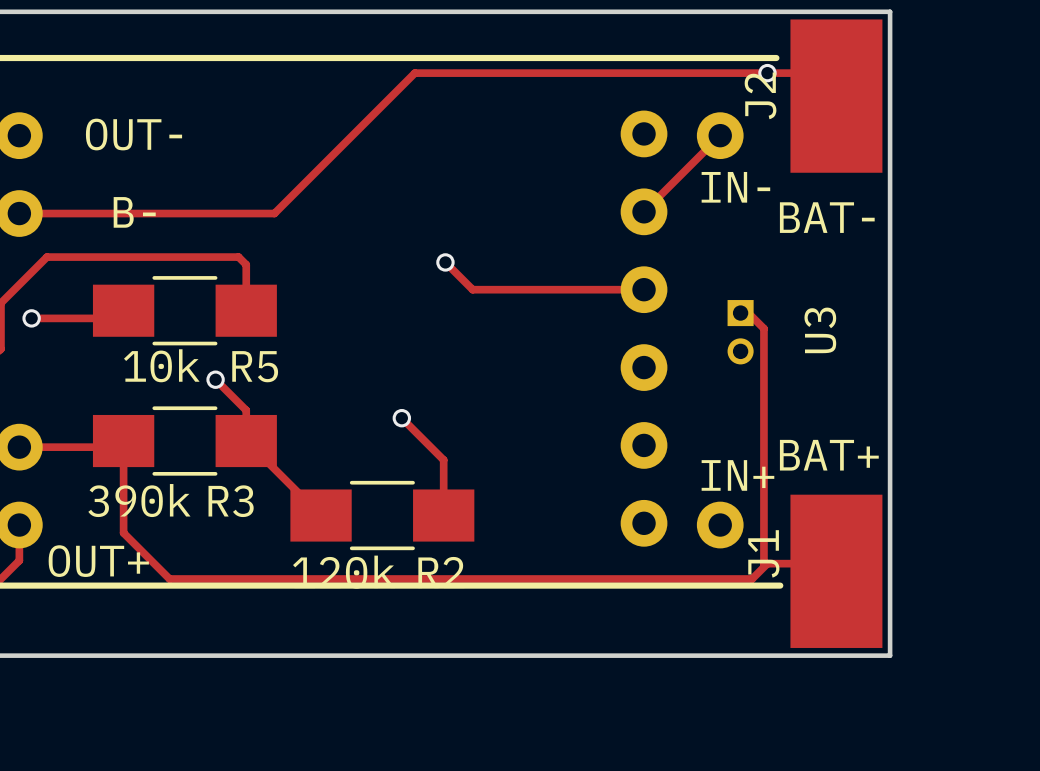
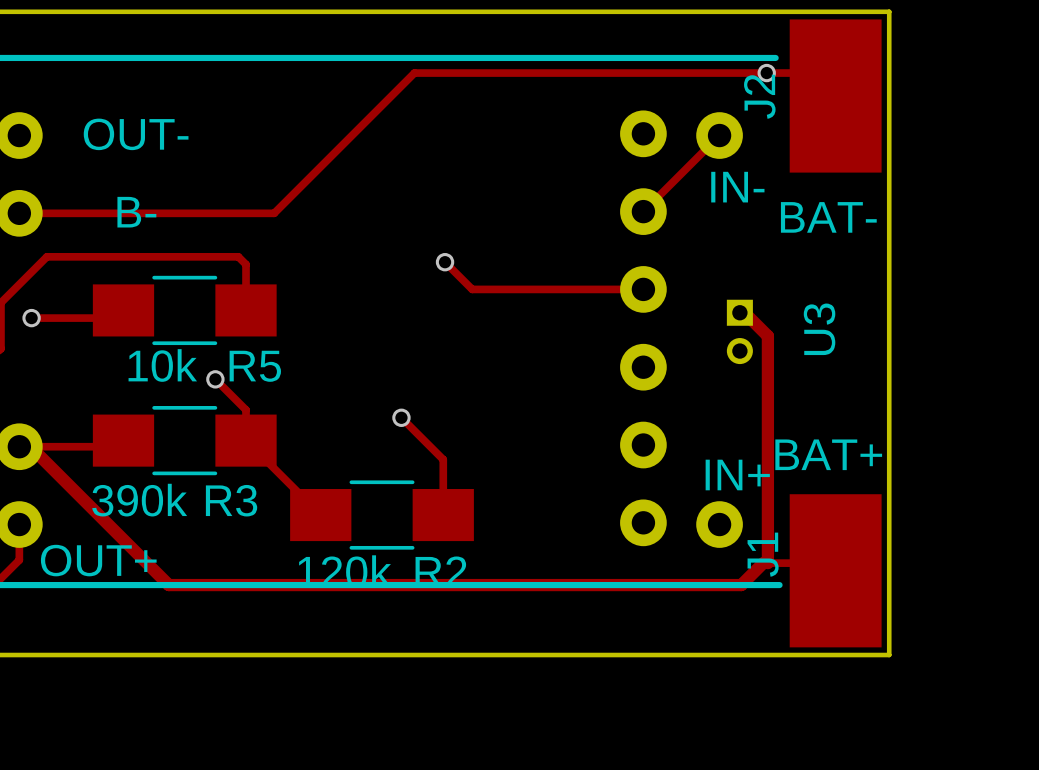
track: (740, 305) (763, 328) (763, 563) -> (30, 446) (168, 585) (741, 585) (763, 563)
track: (123, 441) (123, 533) (169, 578) (752, 578) (767, 563) -> (739, 312) (744, 312) (767, 336) (767, 563)

